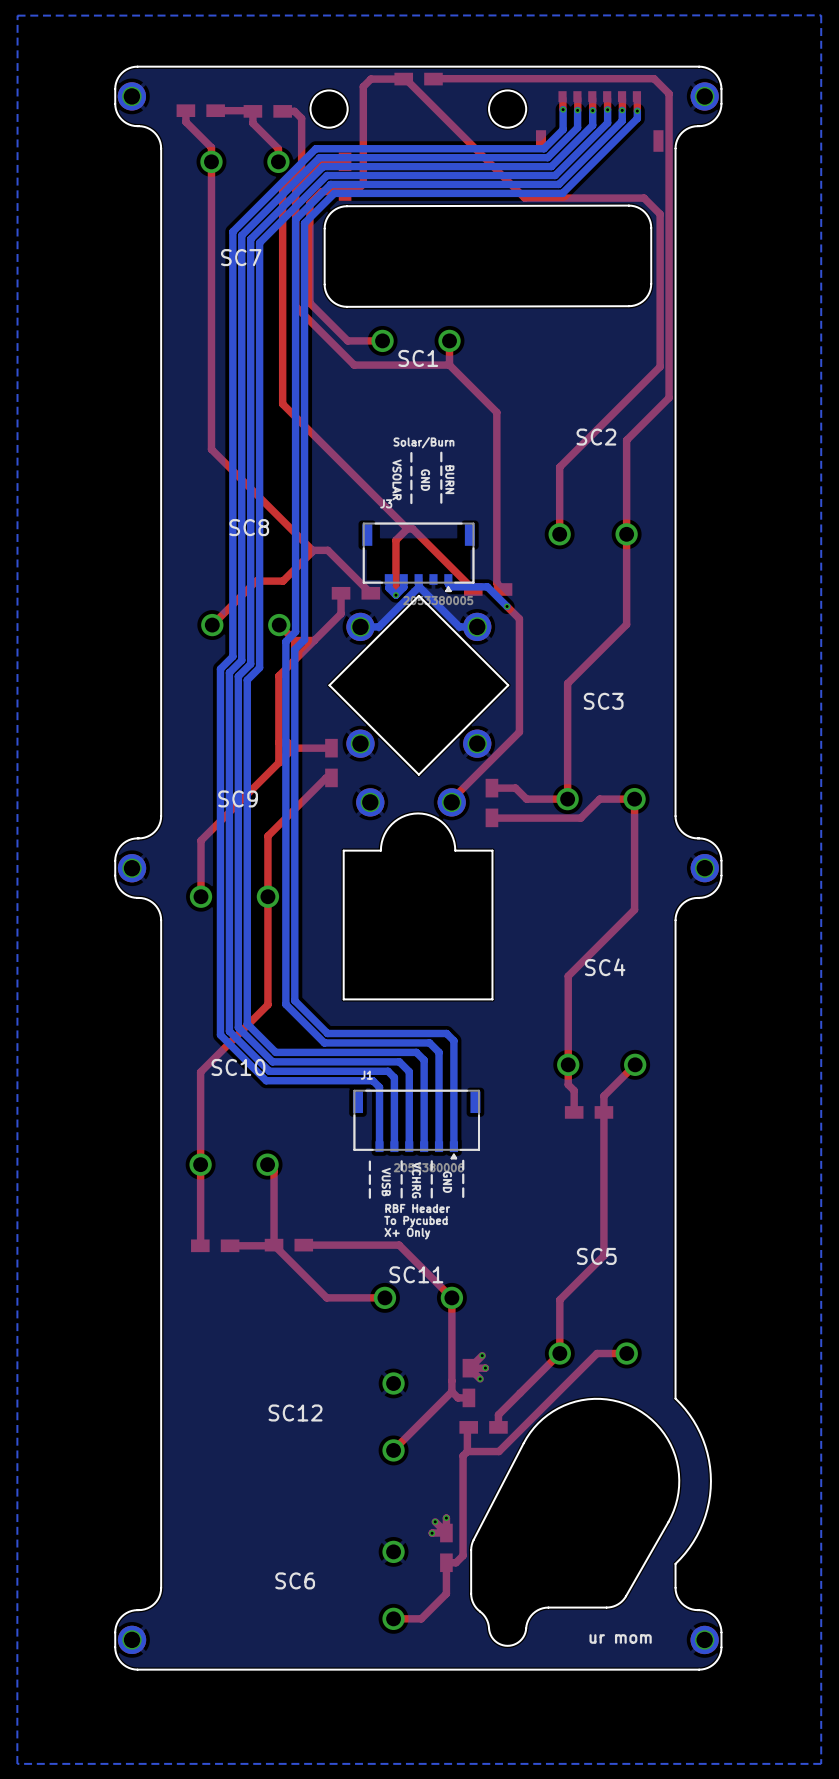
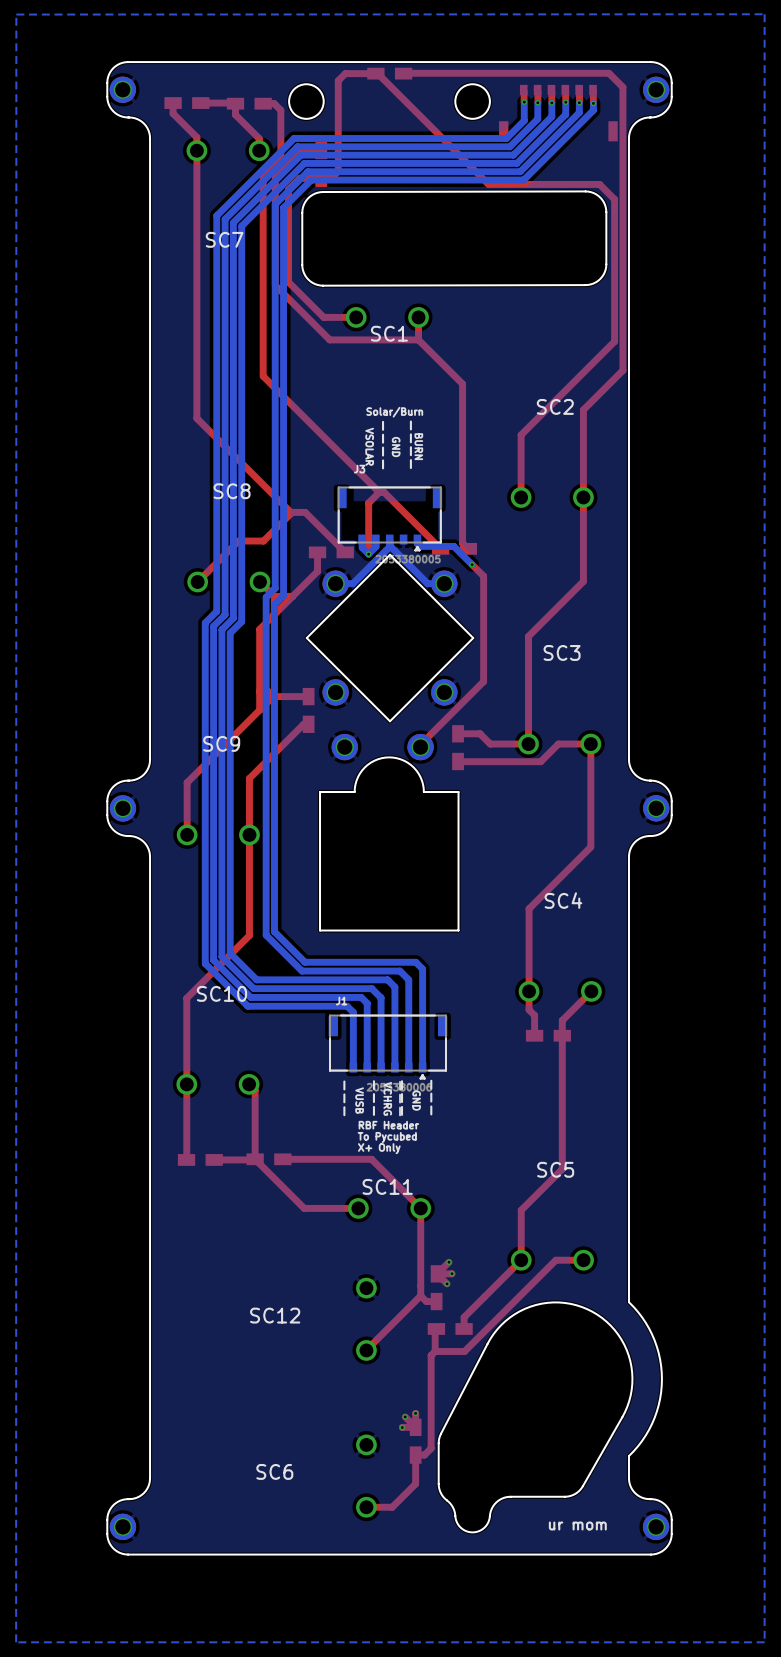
text: none -> --- (400, 1098)

